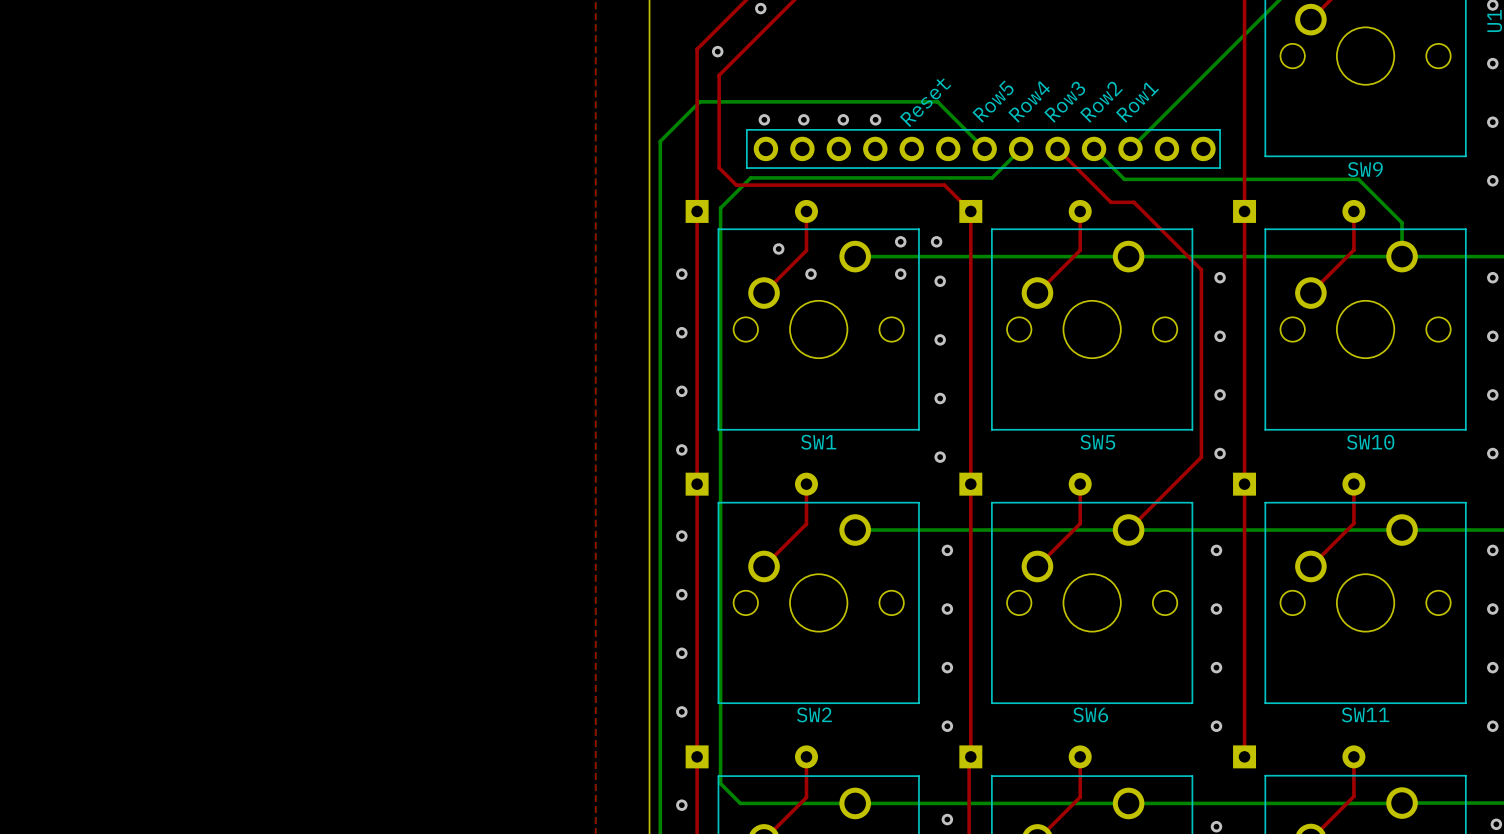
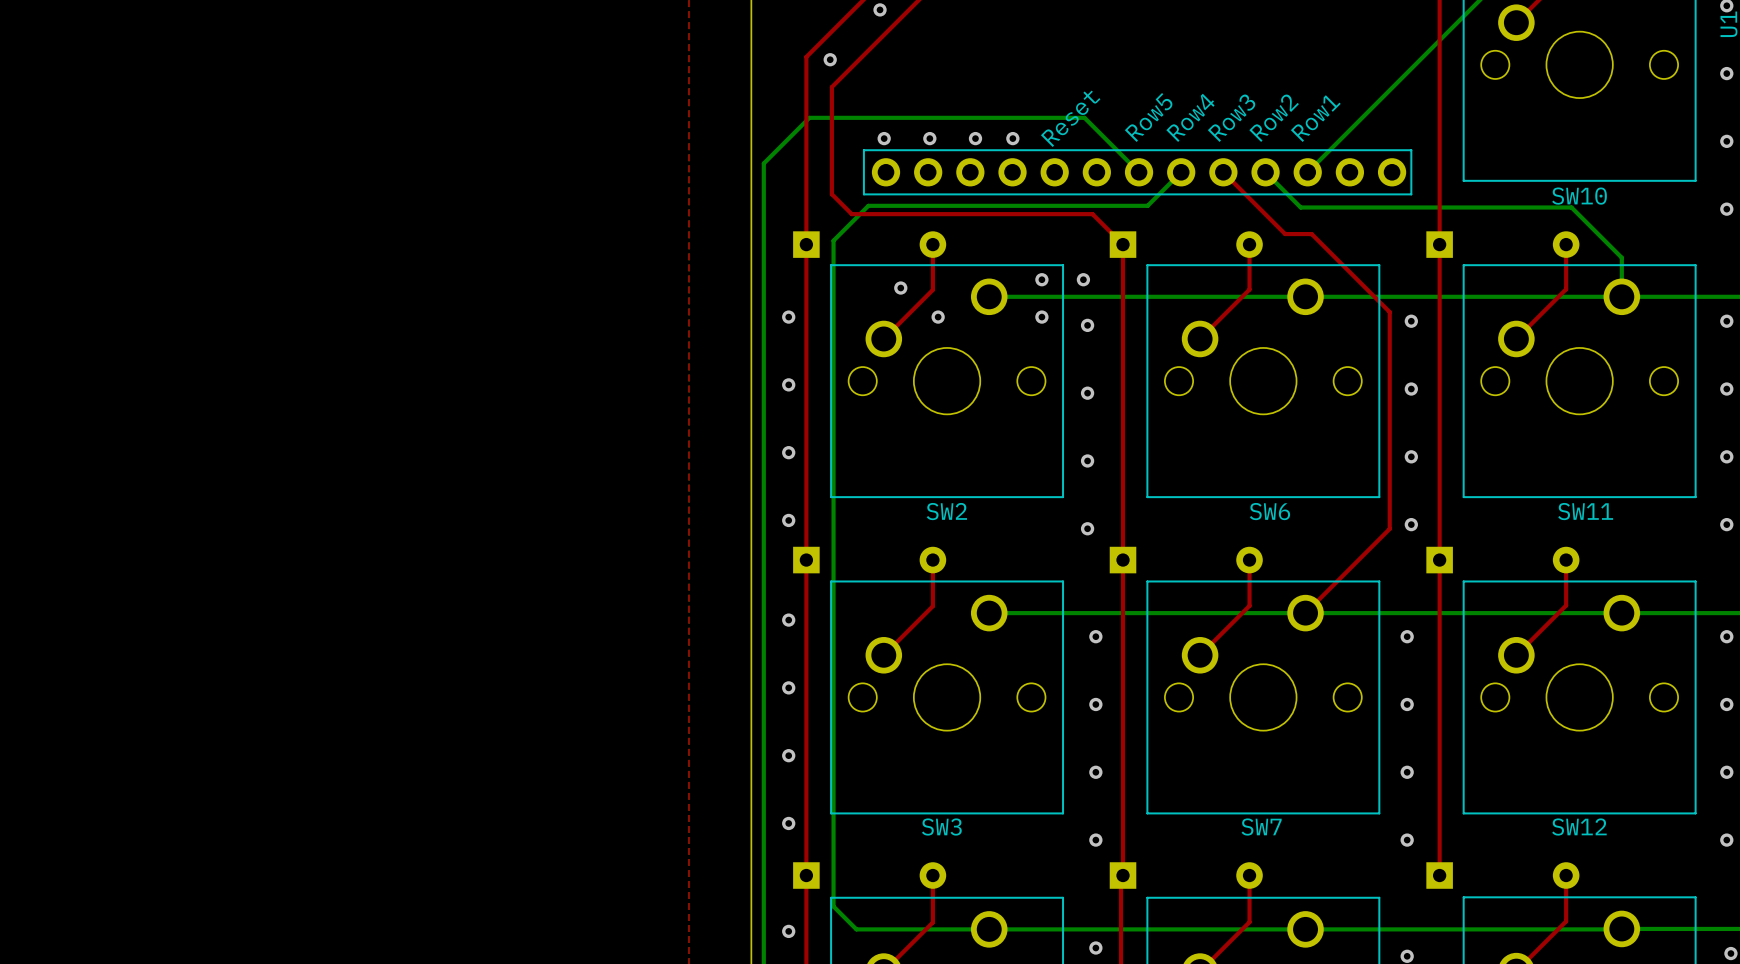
SW9 name: SW9 (1365, 169) -> SW10 (1579, 196)
SW1 name: SW1 (818, 442) -> SW2 (946, 511)
SW5 name: SW5 (1097, 442) -> SW6 (1269, 511)
SW10 name: SW10 (1370, 442) -> SW11 (1585, 511)
SW2 name: SW2 (814, 714) -> SW3 (941, 827)
SW6 name: SW6 (1090, 714) -> SW7 (1261, 827)
SW11 name: SW11 (1365, 714) -> SW12 (1579, 827)

